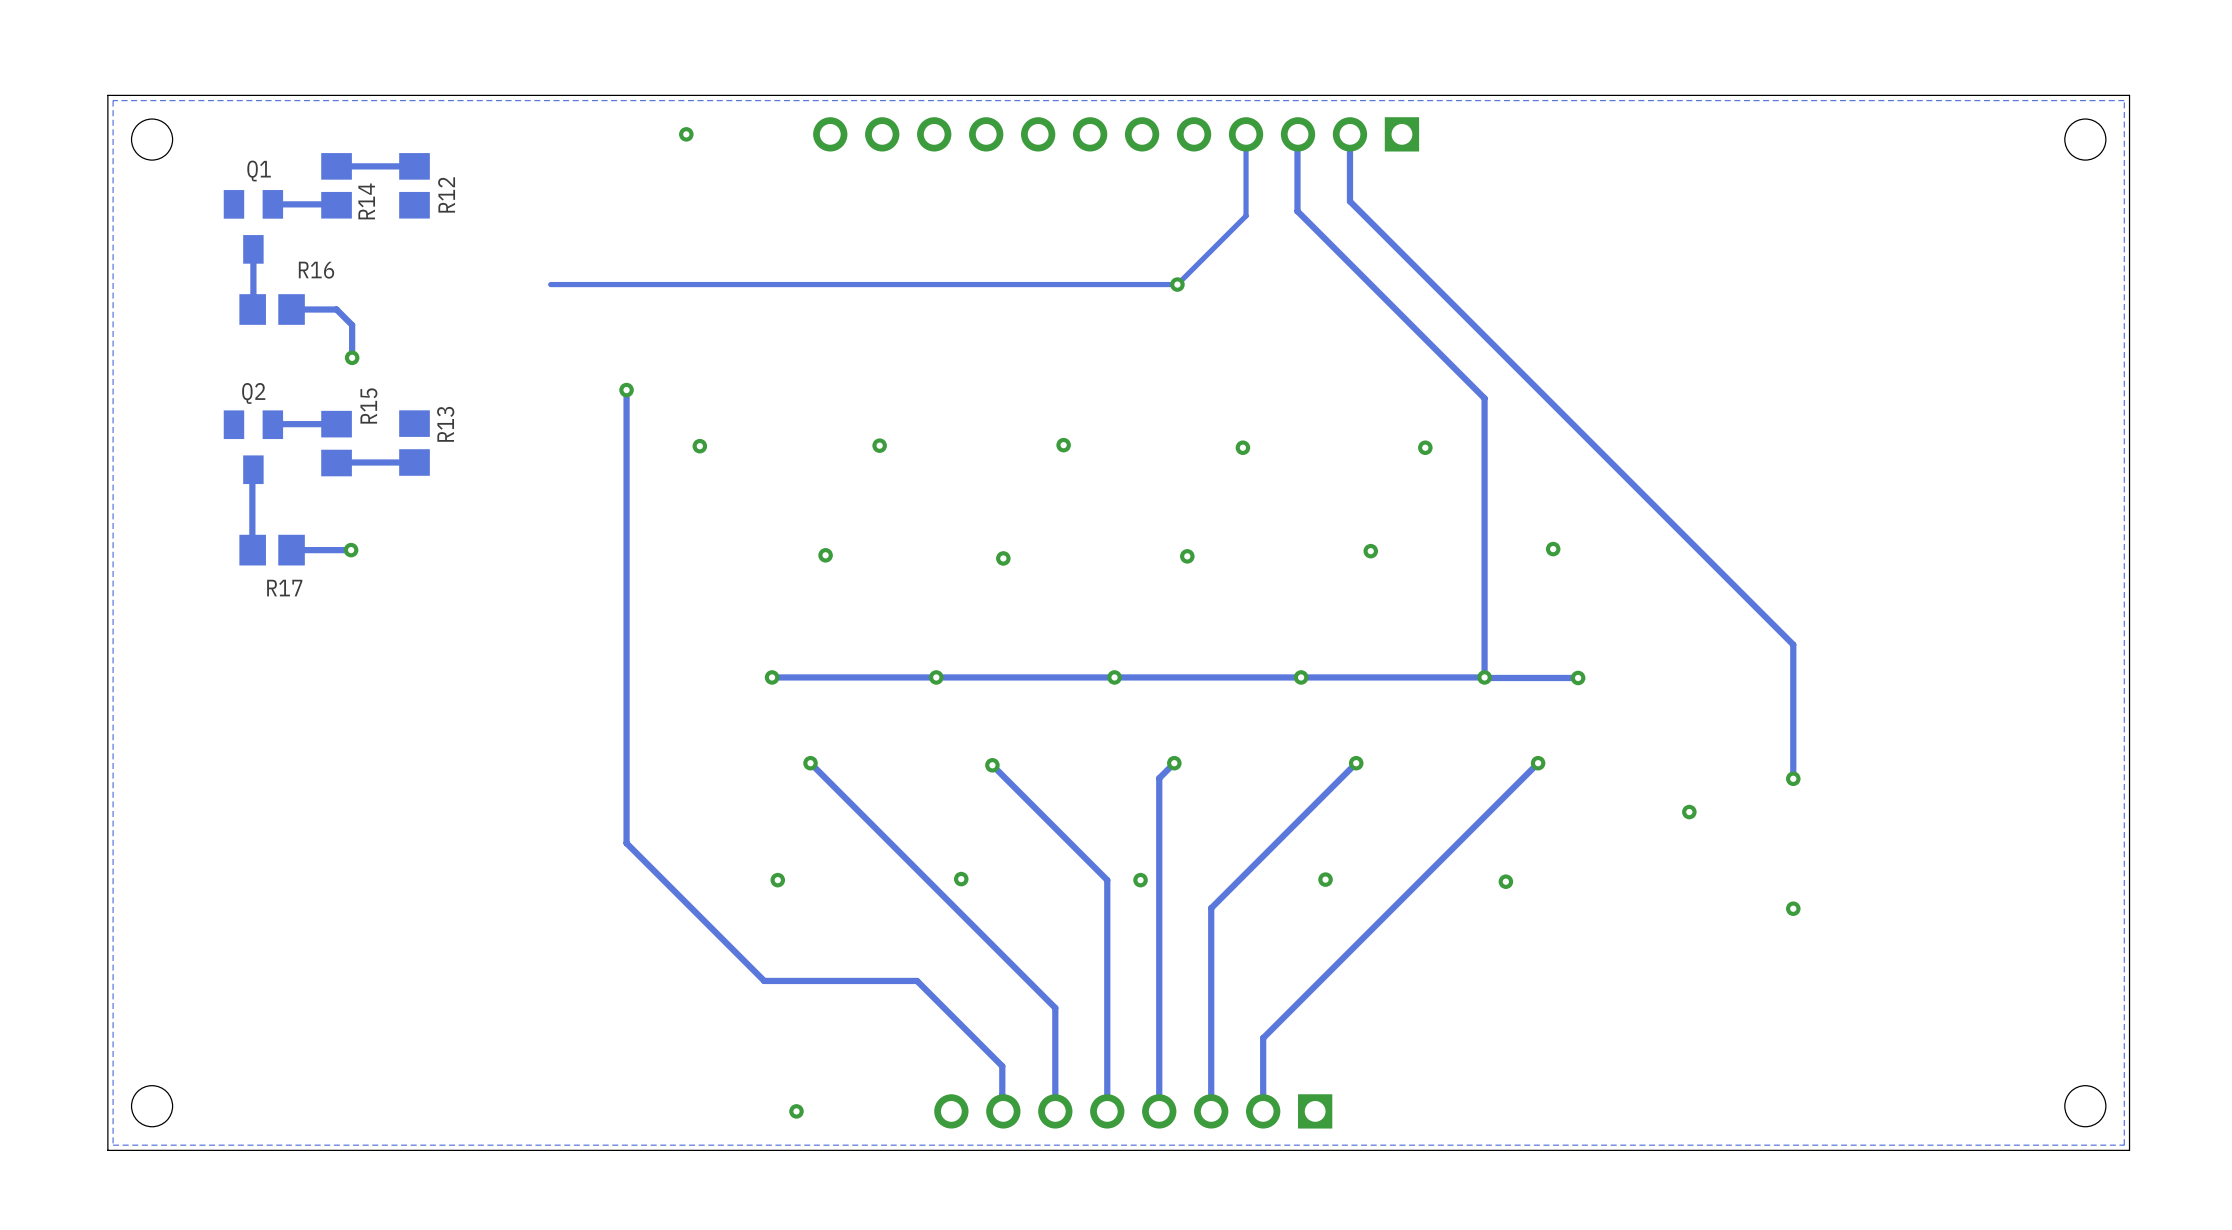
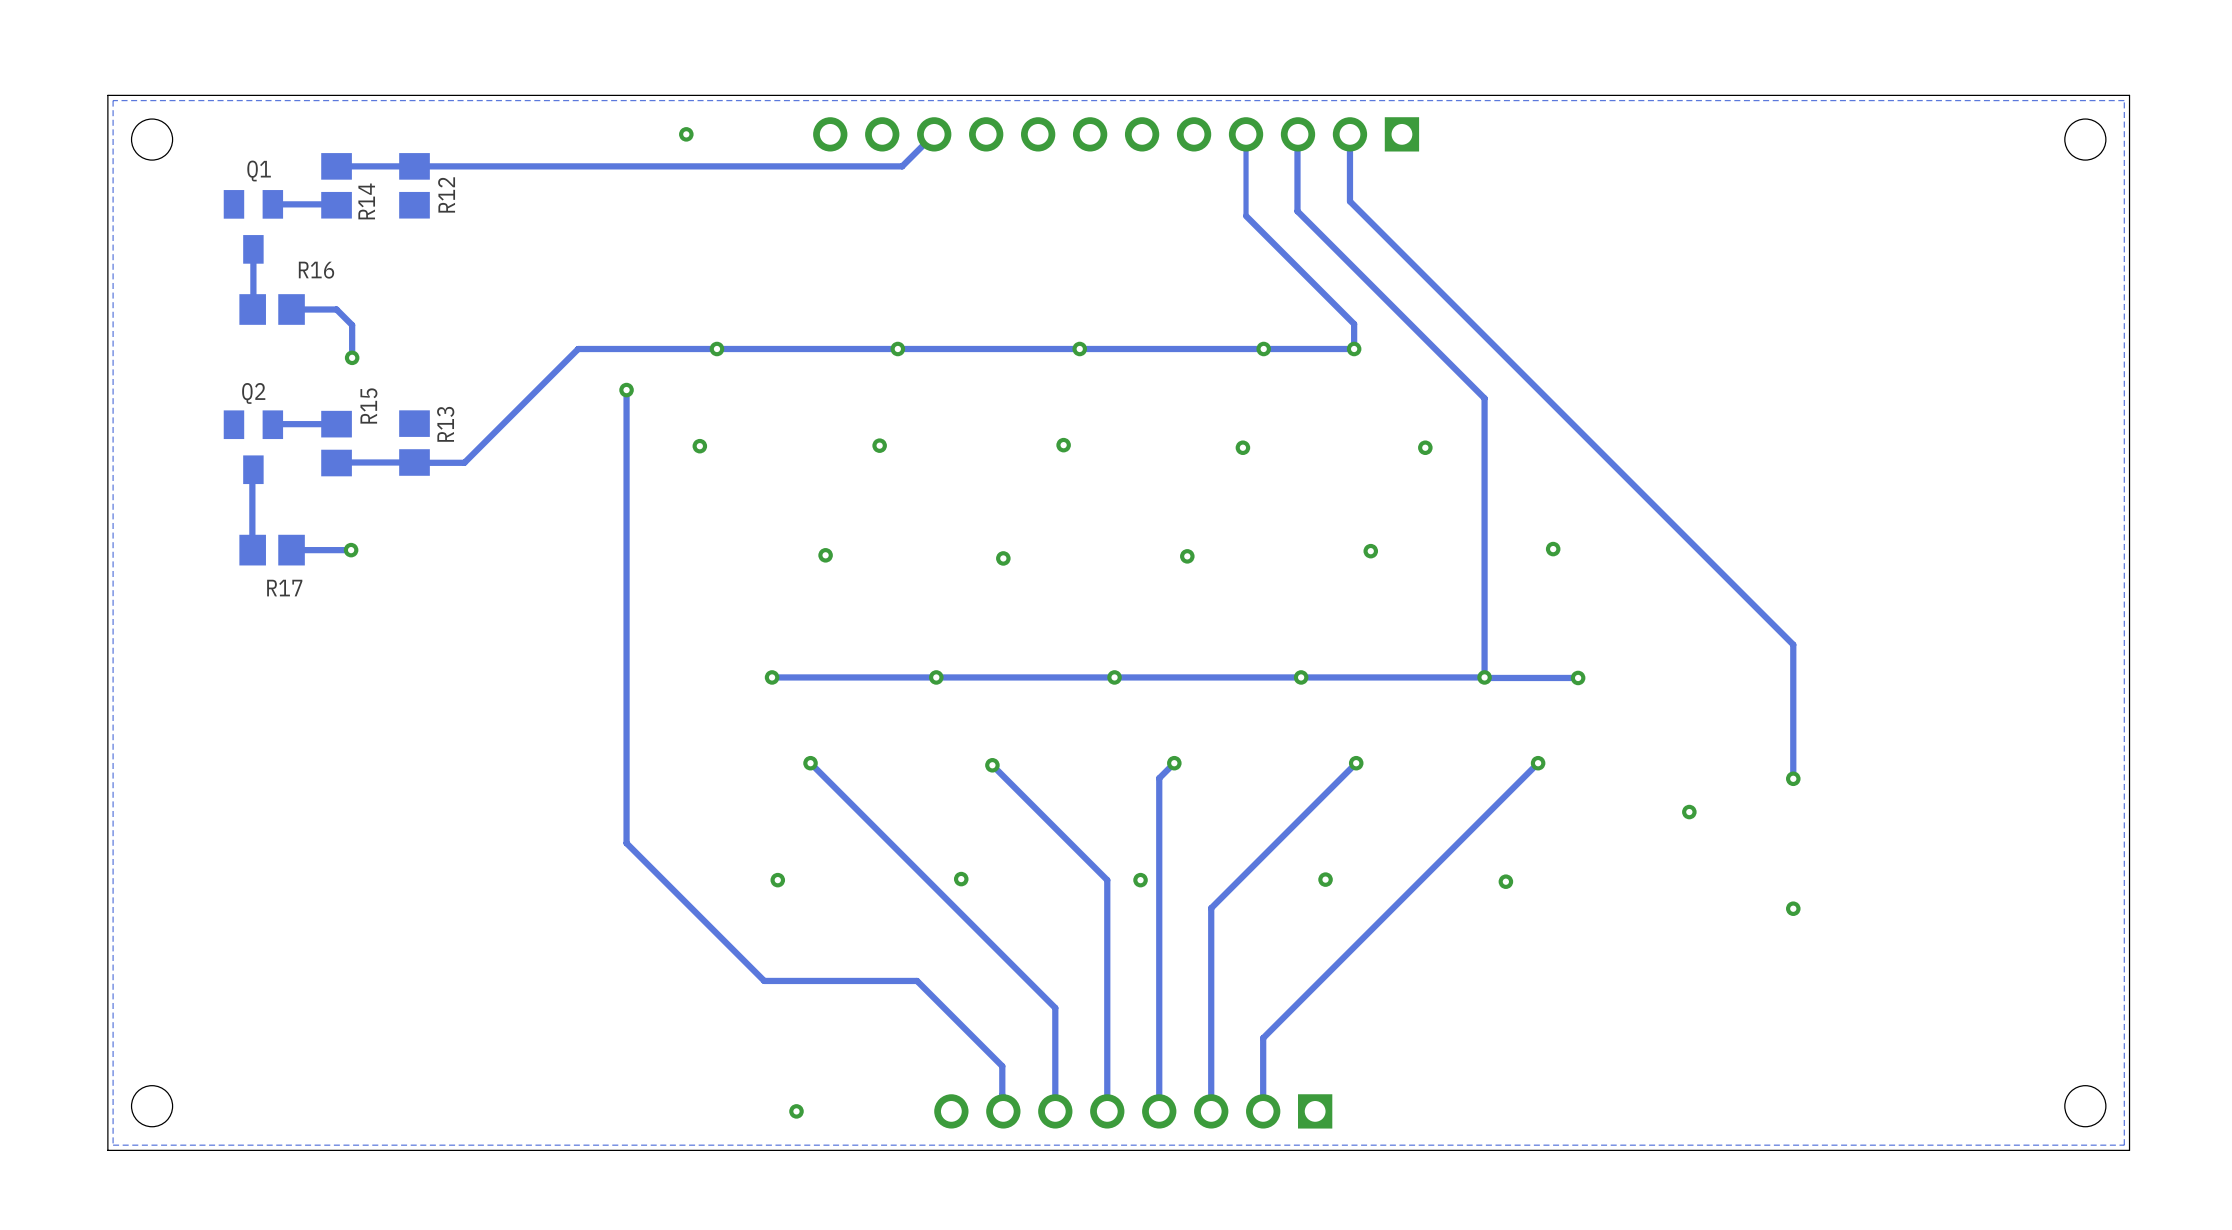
track: none -> (934, 134) (902, 166) (414, 166)
track: (1246, 215) (1177, 284) (550, 284) -> (1246, 215) (1354, 324) (1354, 349) (578, 349) (464, 462) (414, 462)
via: (1177, 284) -> none
via: none -> (716, 349)
via: none -> (897, 349)
via: none -> (1079, 349)
via: none -> (1263, 349)
via: none -> (1354, 349)

